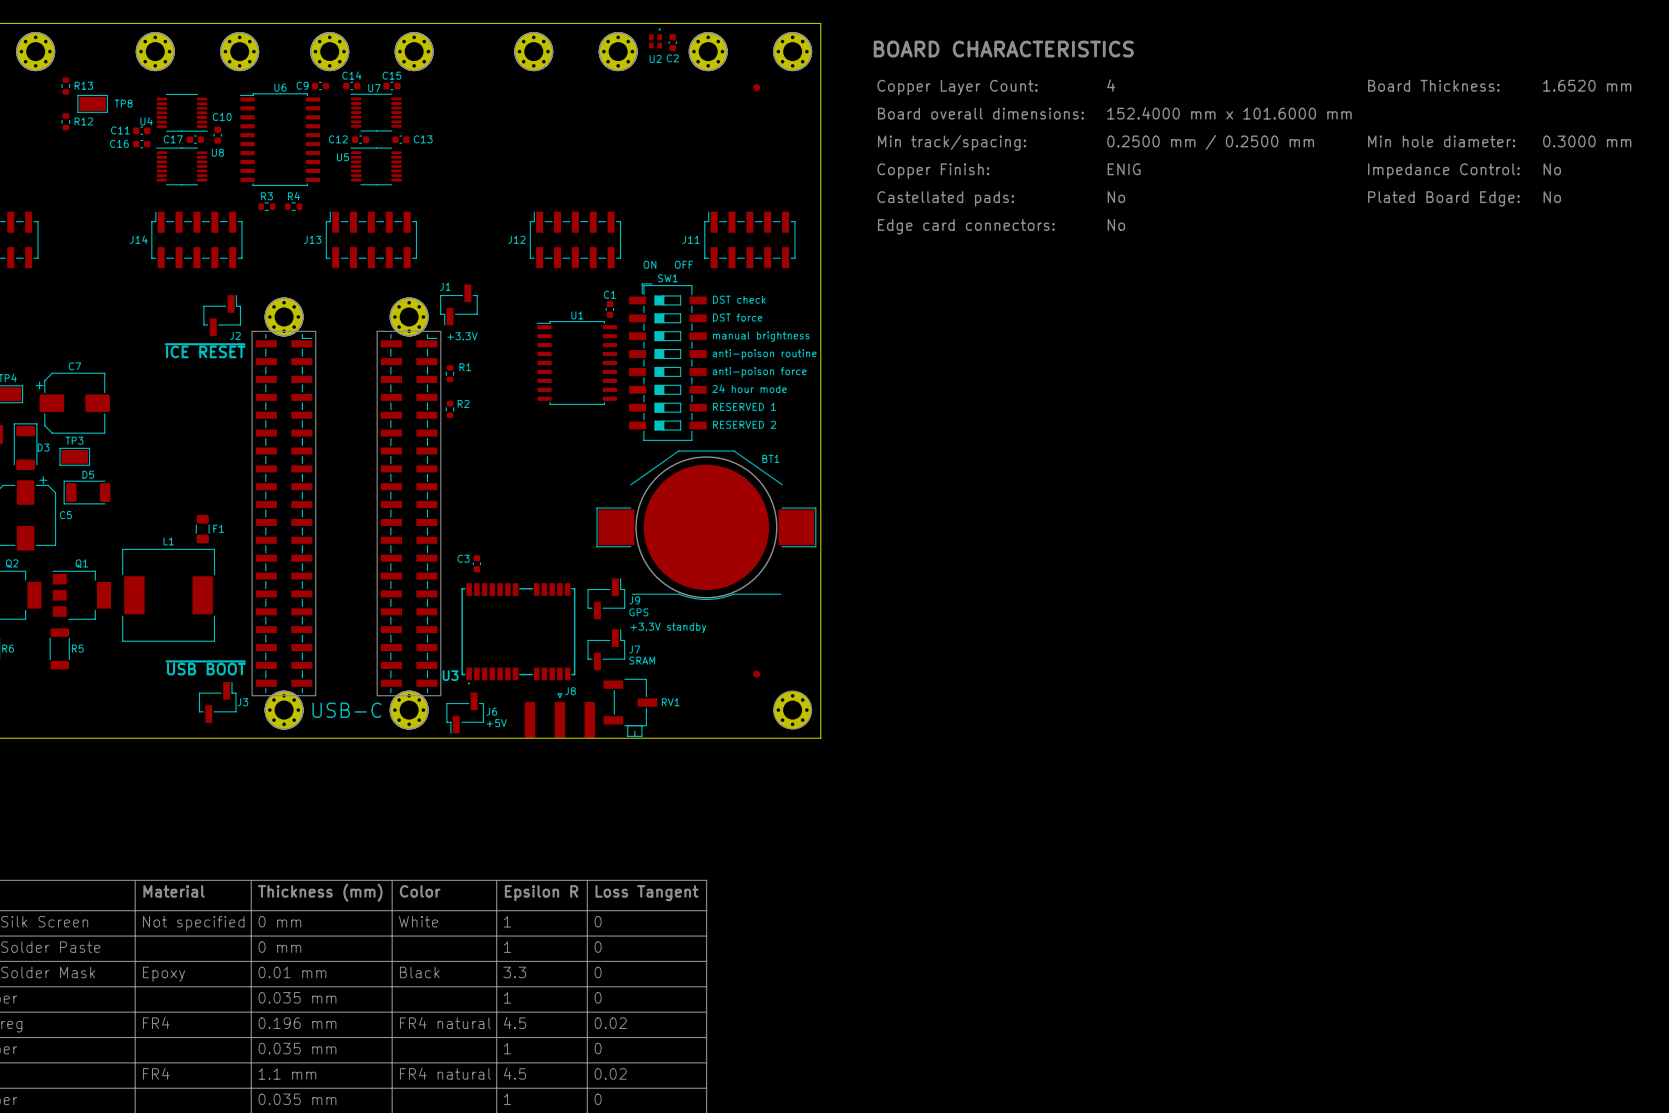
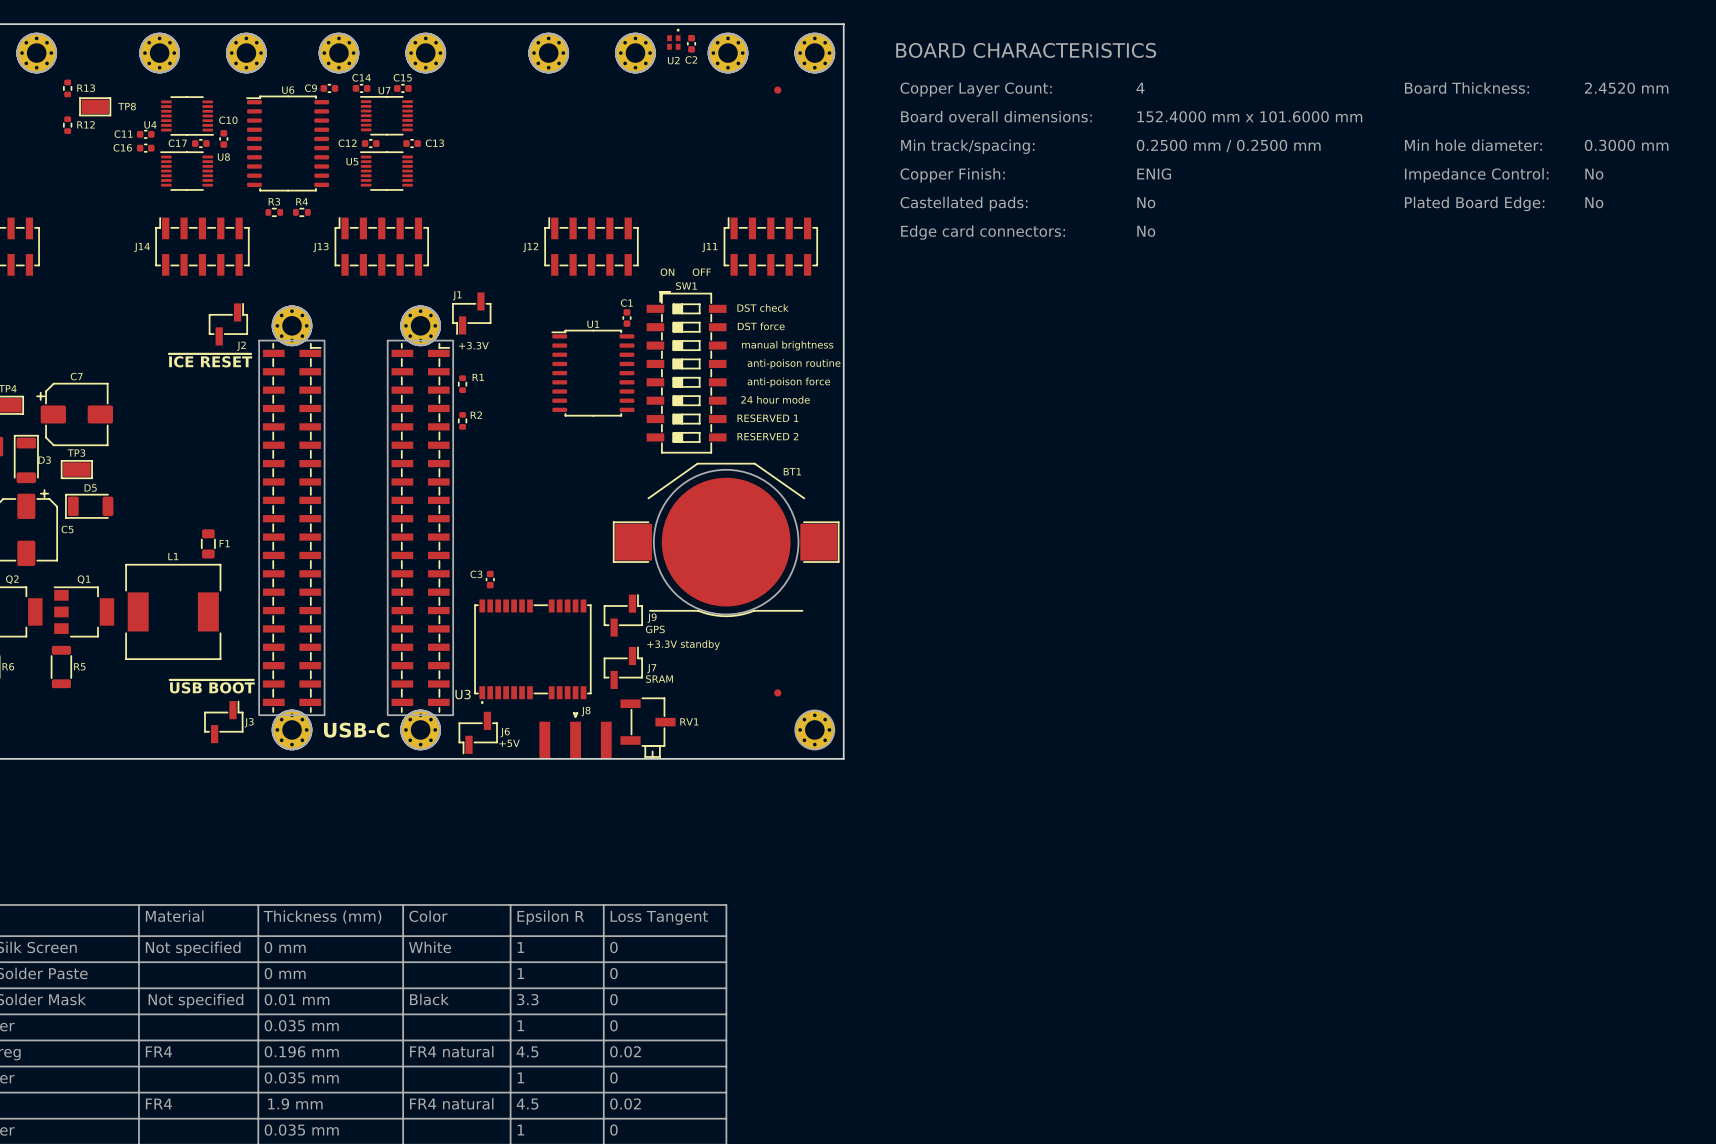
text: 1.6520 mm (1587, 85) -> 2.4520 mm (1626, 88)
text: Epoxy (164, 974) -> Not specified (195, 1000)
text: 1.1 mm (287, 1073) -> 1.9 mm (295, 1103)

